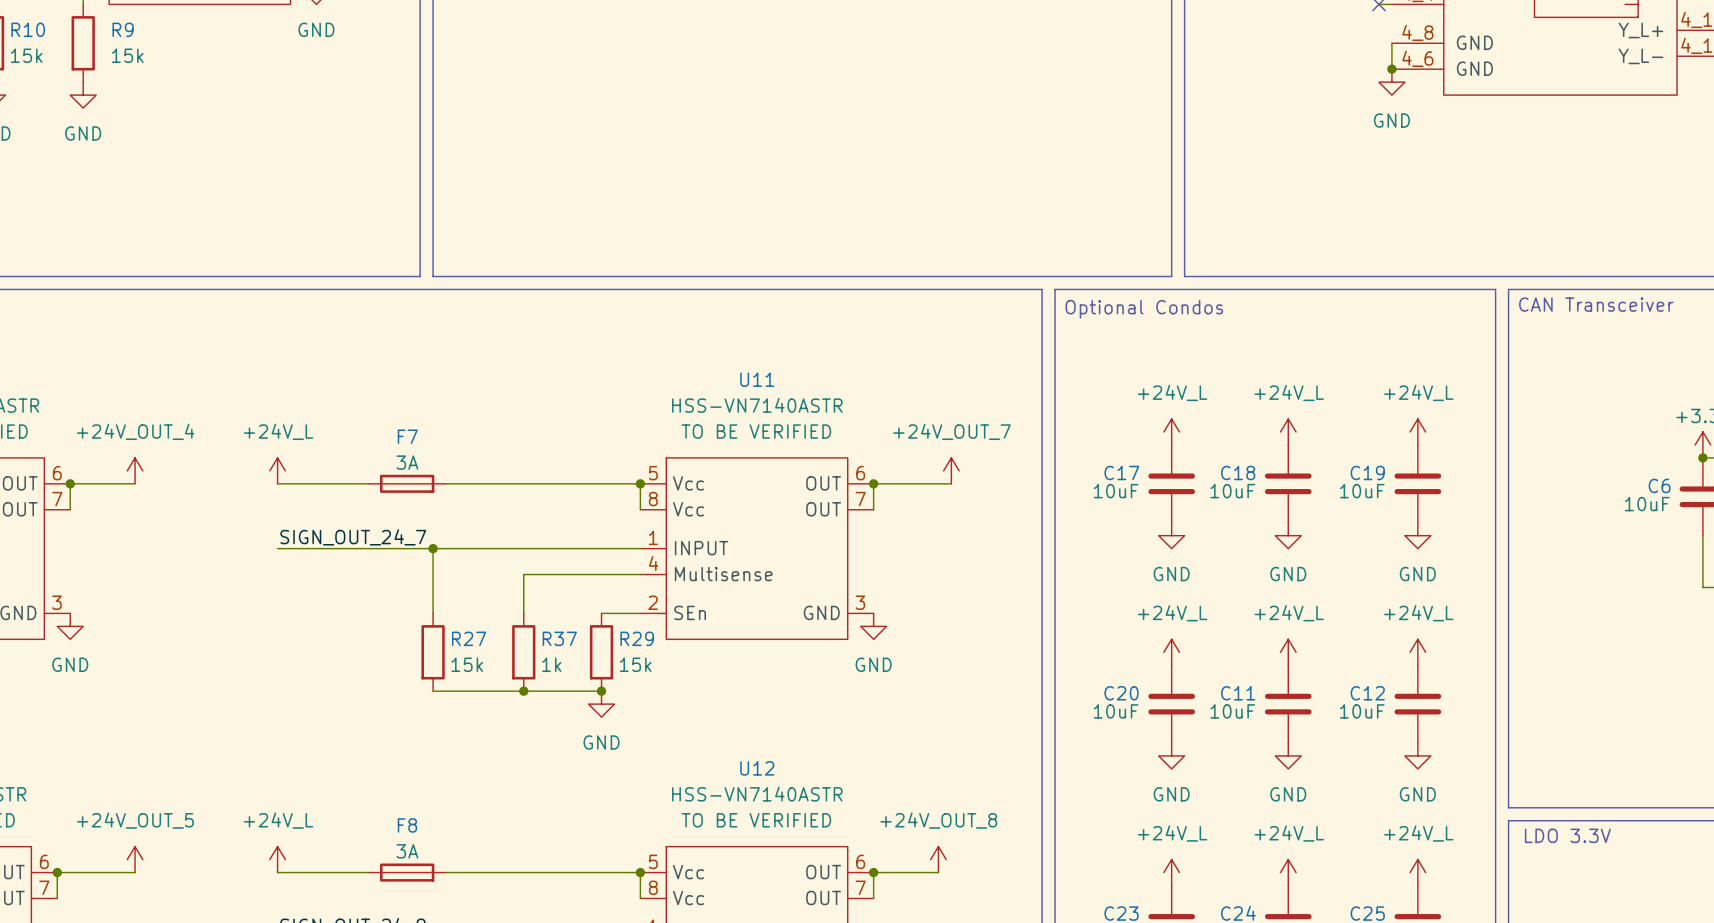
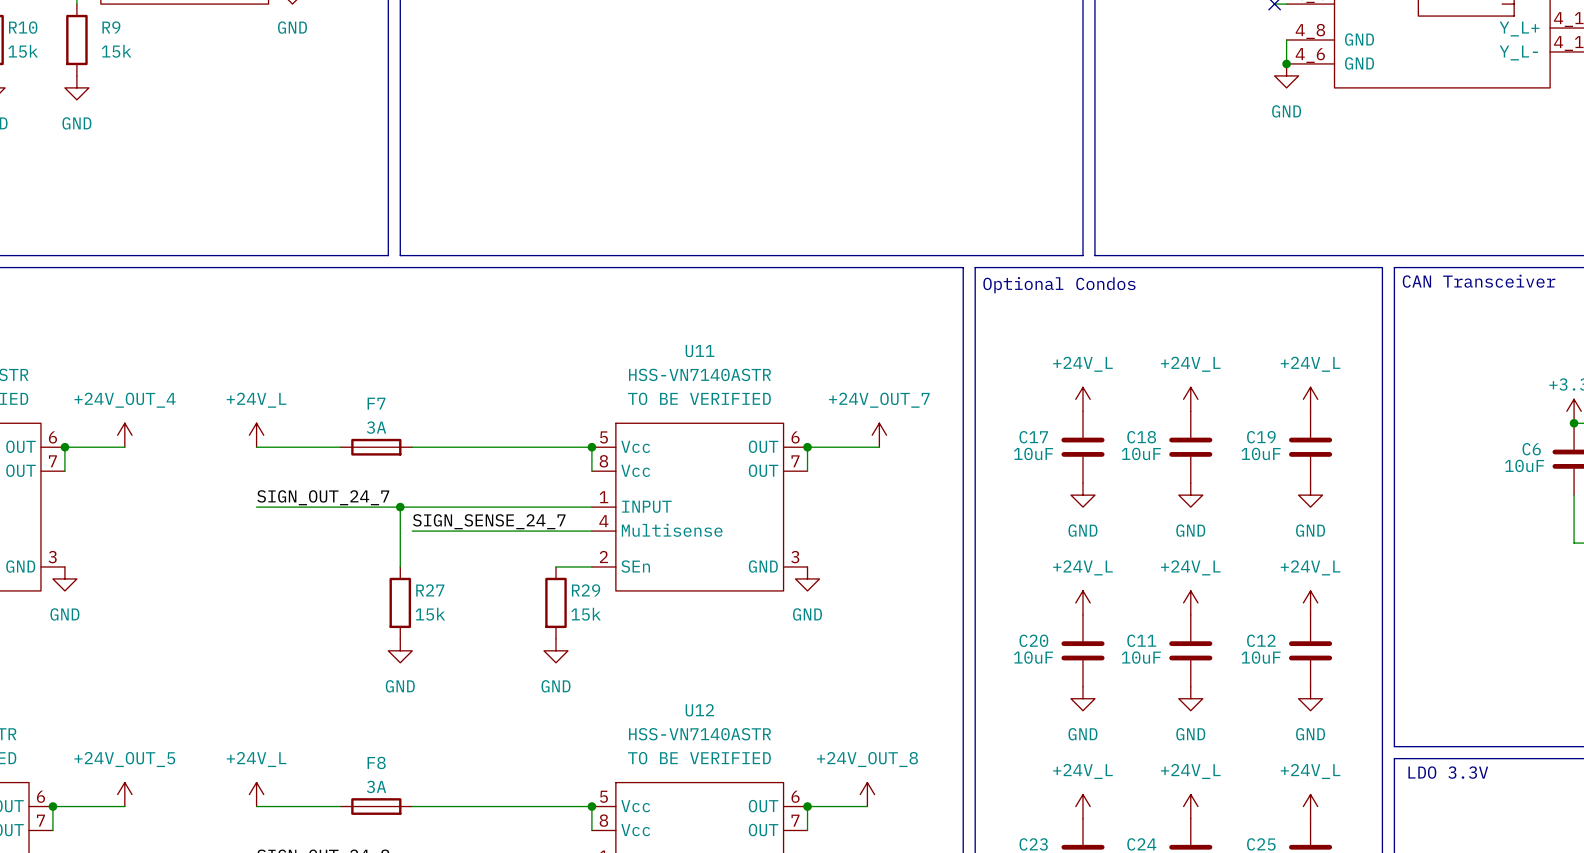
label: none -> SIGN_SENSE_24_7 (489, 521)
wire: (523, 574) (523, 613) -> (484, 531) (412, 531)
R37: 1k (523, 652) -> none
wire: (433, 691) (601, 691) -> none
junction: (523, 691) -> none
junction: (601, 691) -> none
power symbol: none -> GND (400, 650)

